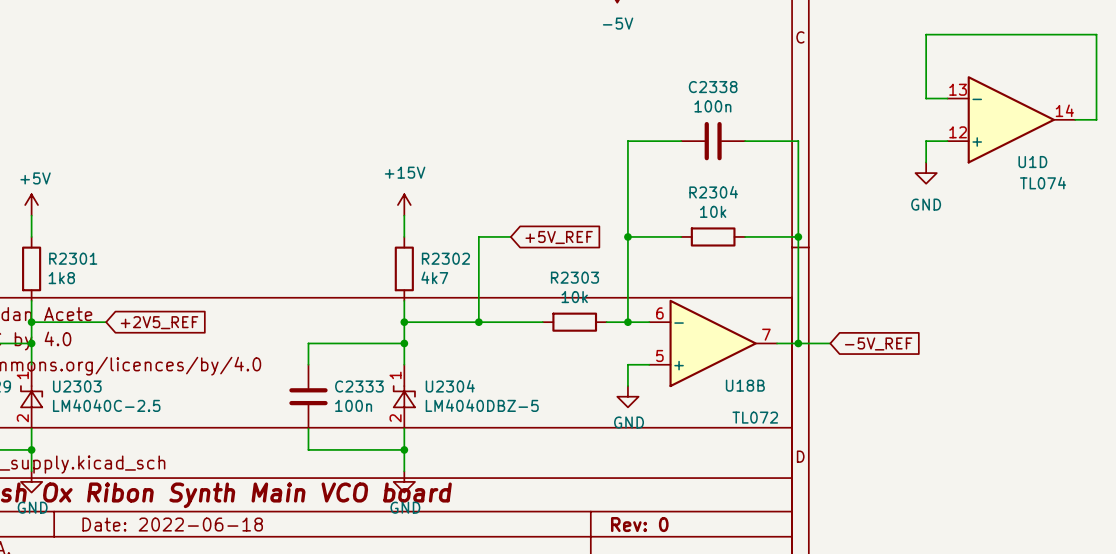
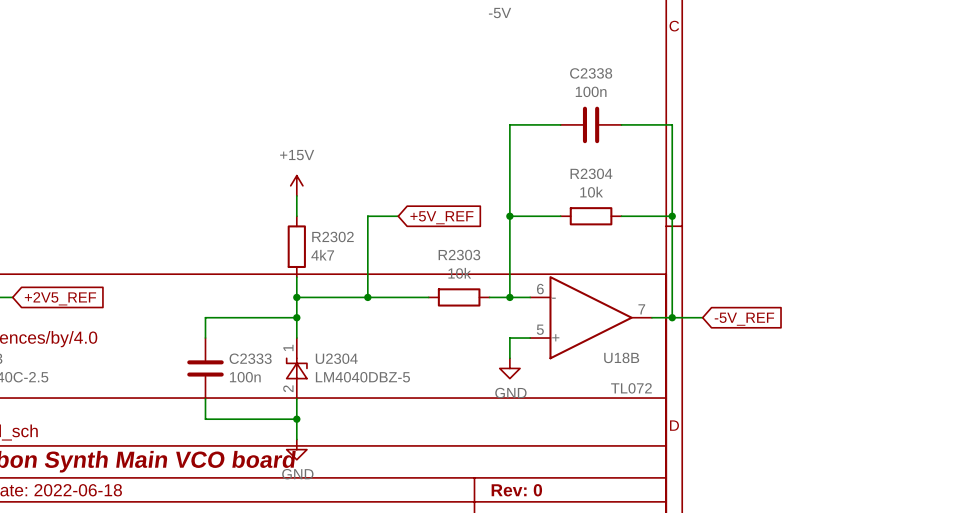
wire: (947, 98) (926, 98) (926, 34) (1096, 34) (1096, 119) (1075, 119) -> none
U1D: TL074 (1011, 119) -> none
wire: (947, 141) (926, 141) (926, 162) -> none
power symbol: GND (926, 173) -> none

